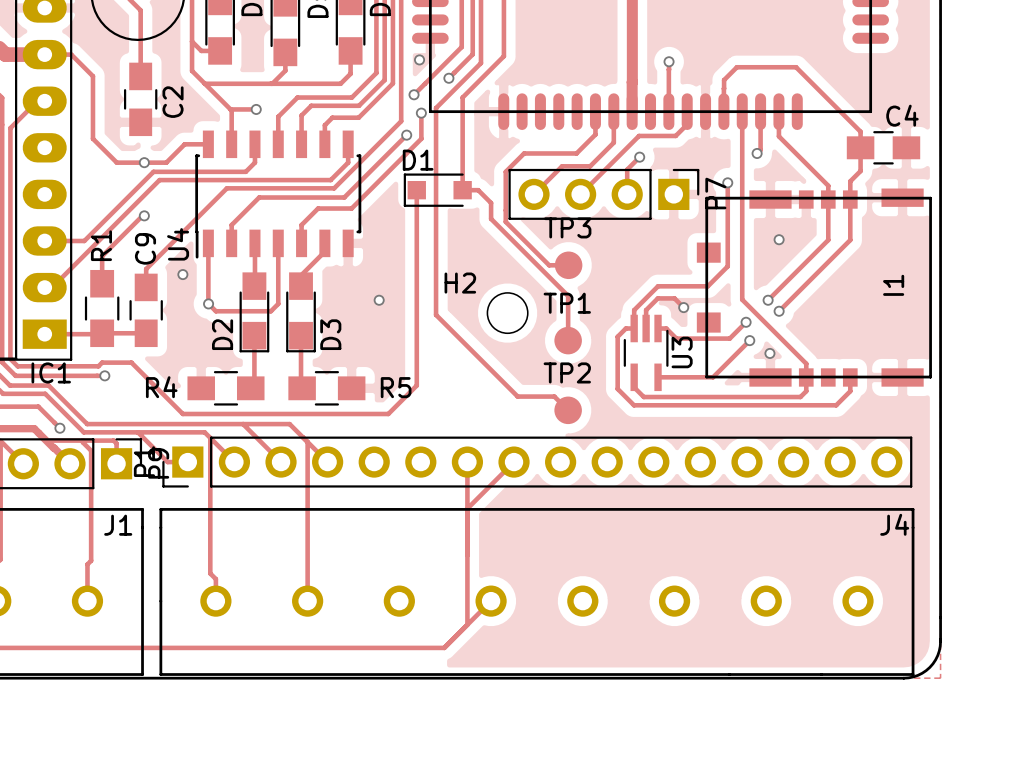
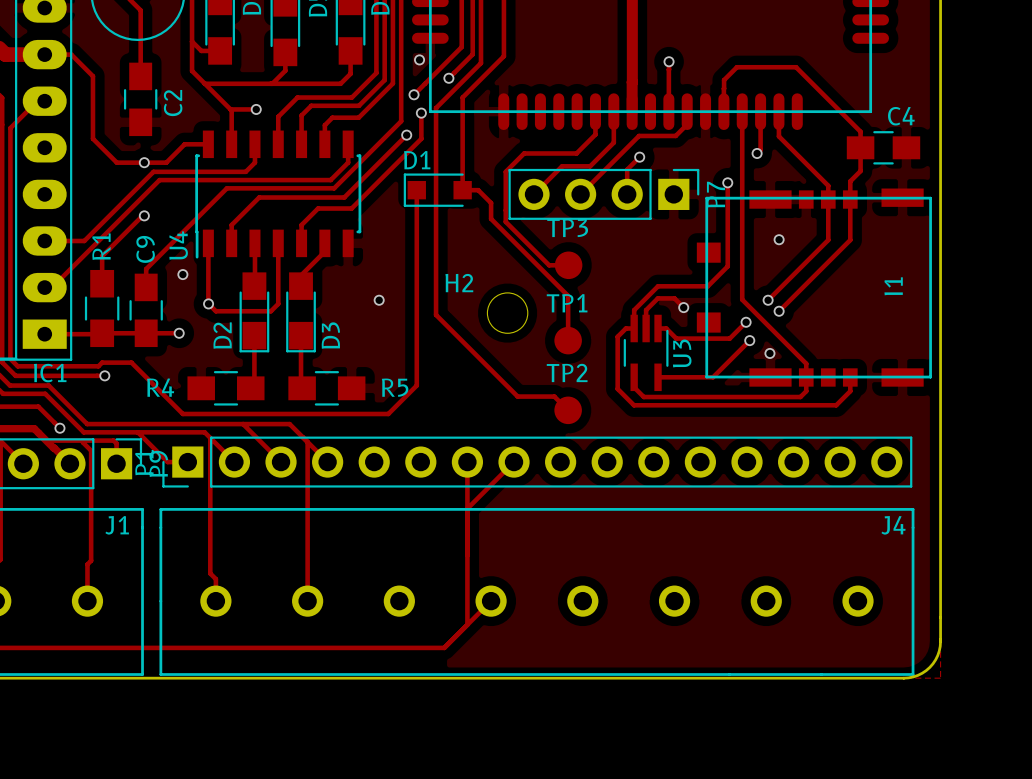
track: none -> (146, 333) (179, 333)
via: none -> (179, 333)

